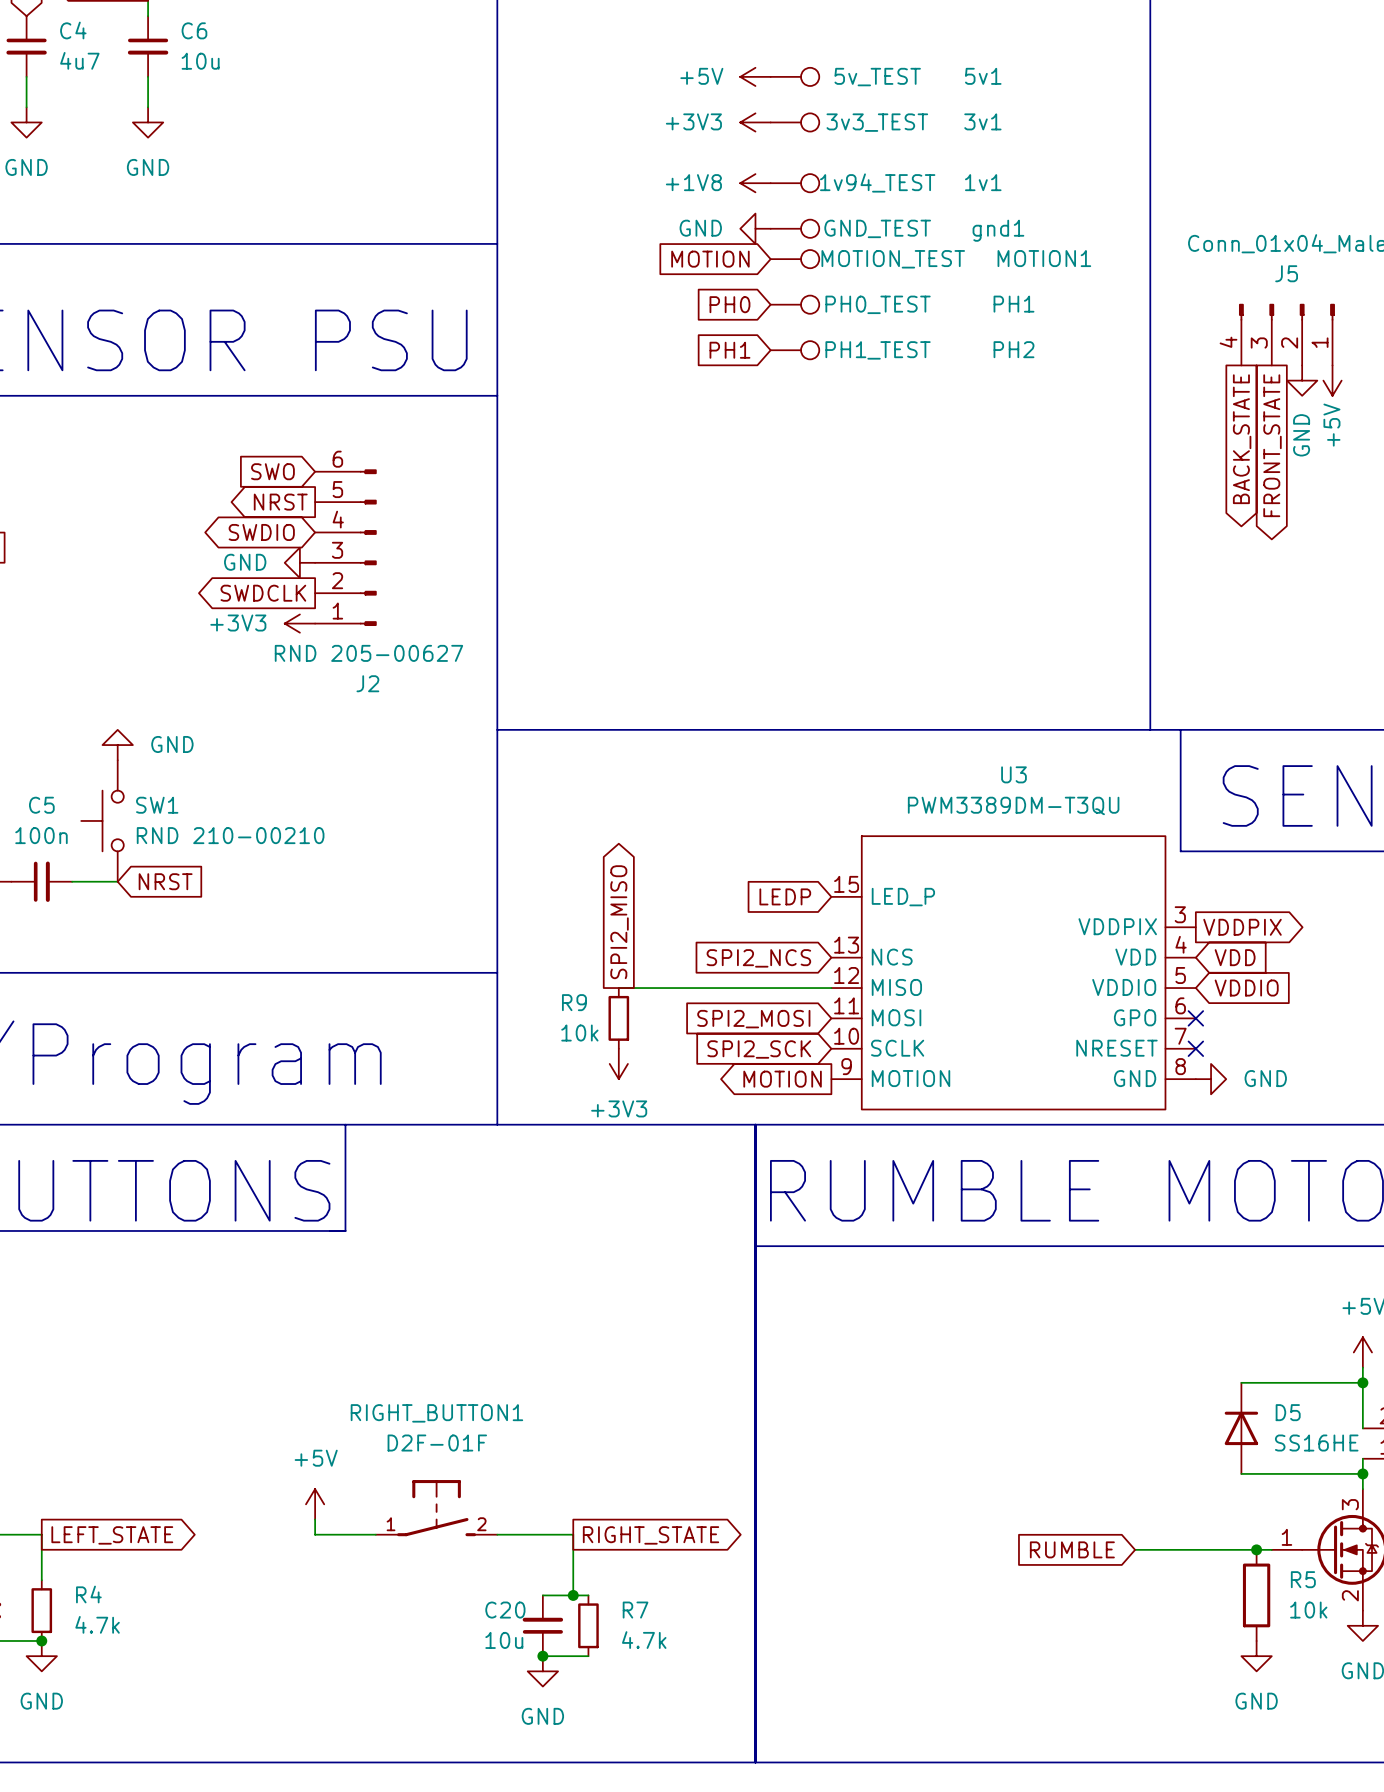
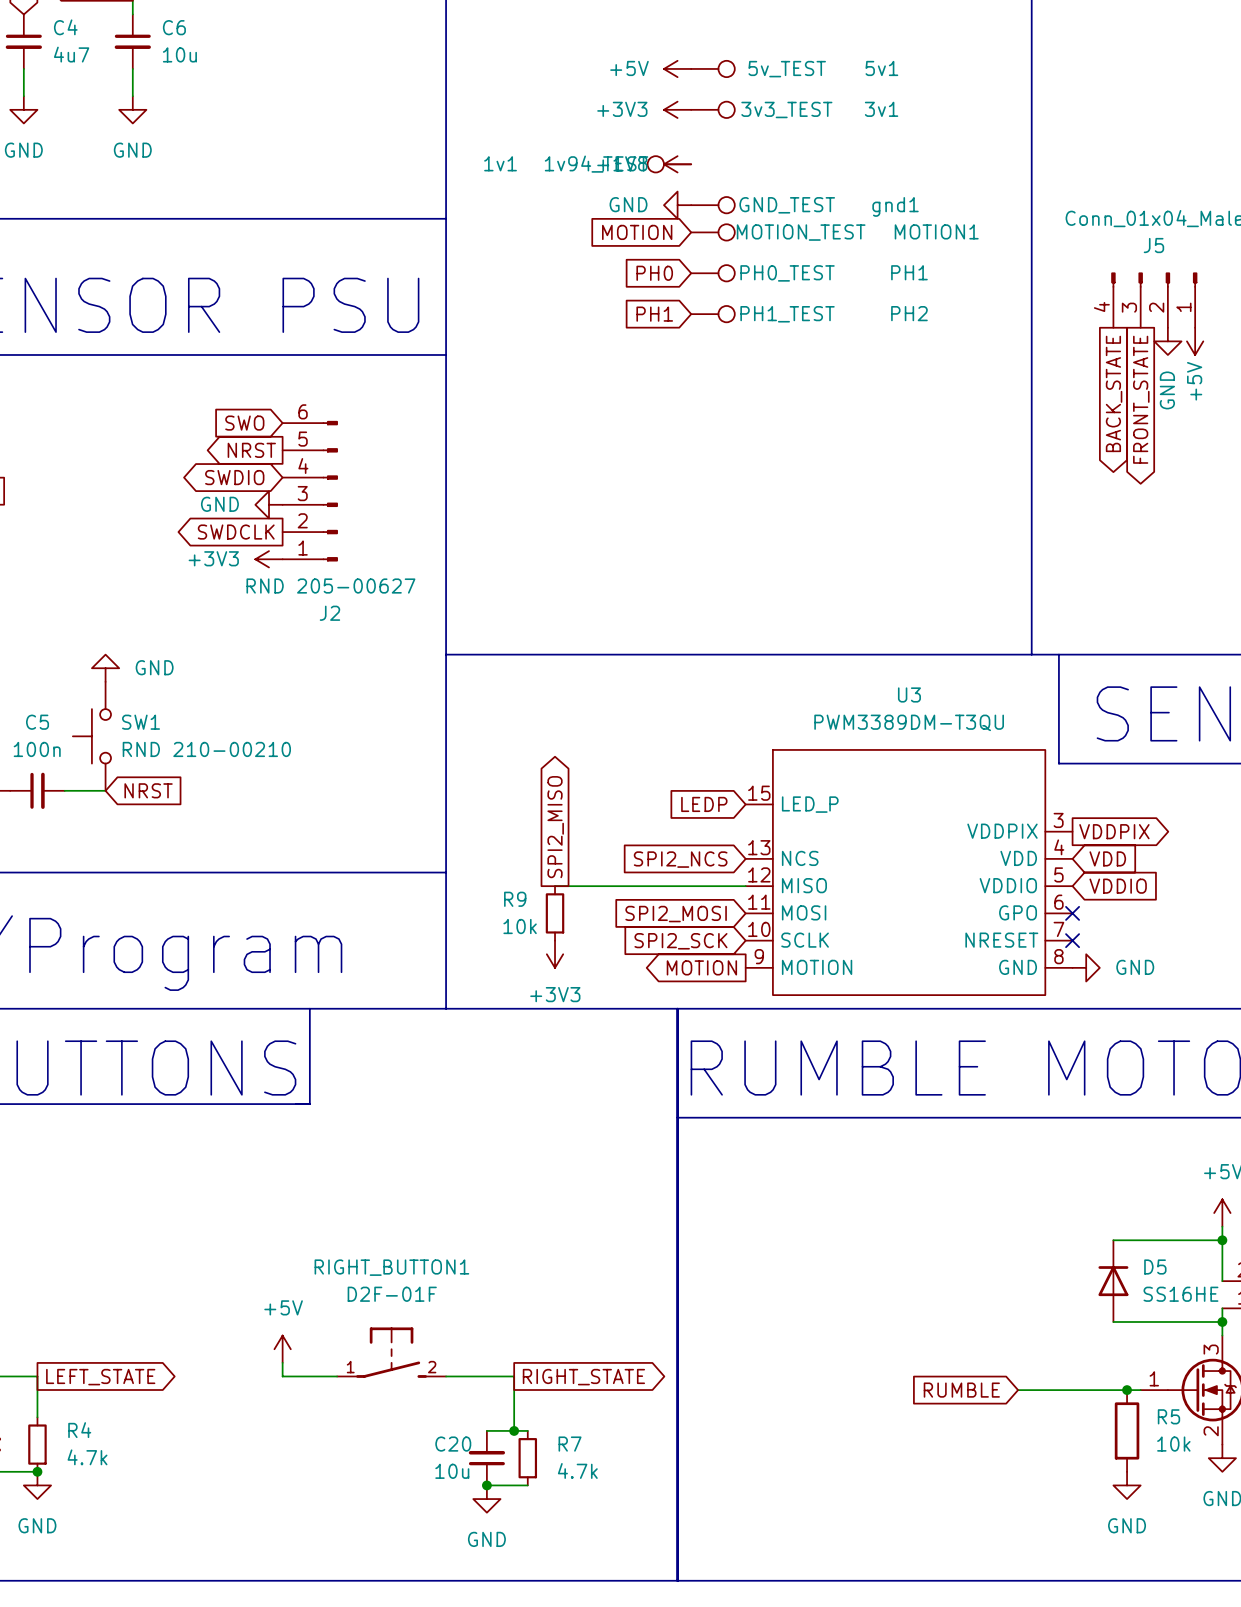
1v1 position: (794, 183) -> (669, 164)
1v1 rotation: 0° (810, 183) -> 180° (655, 164)

